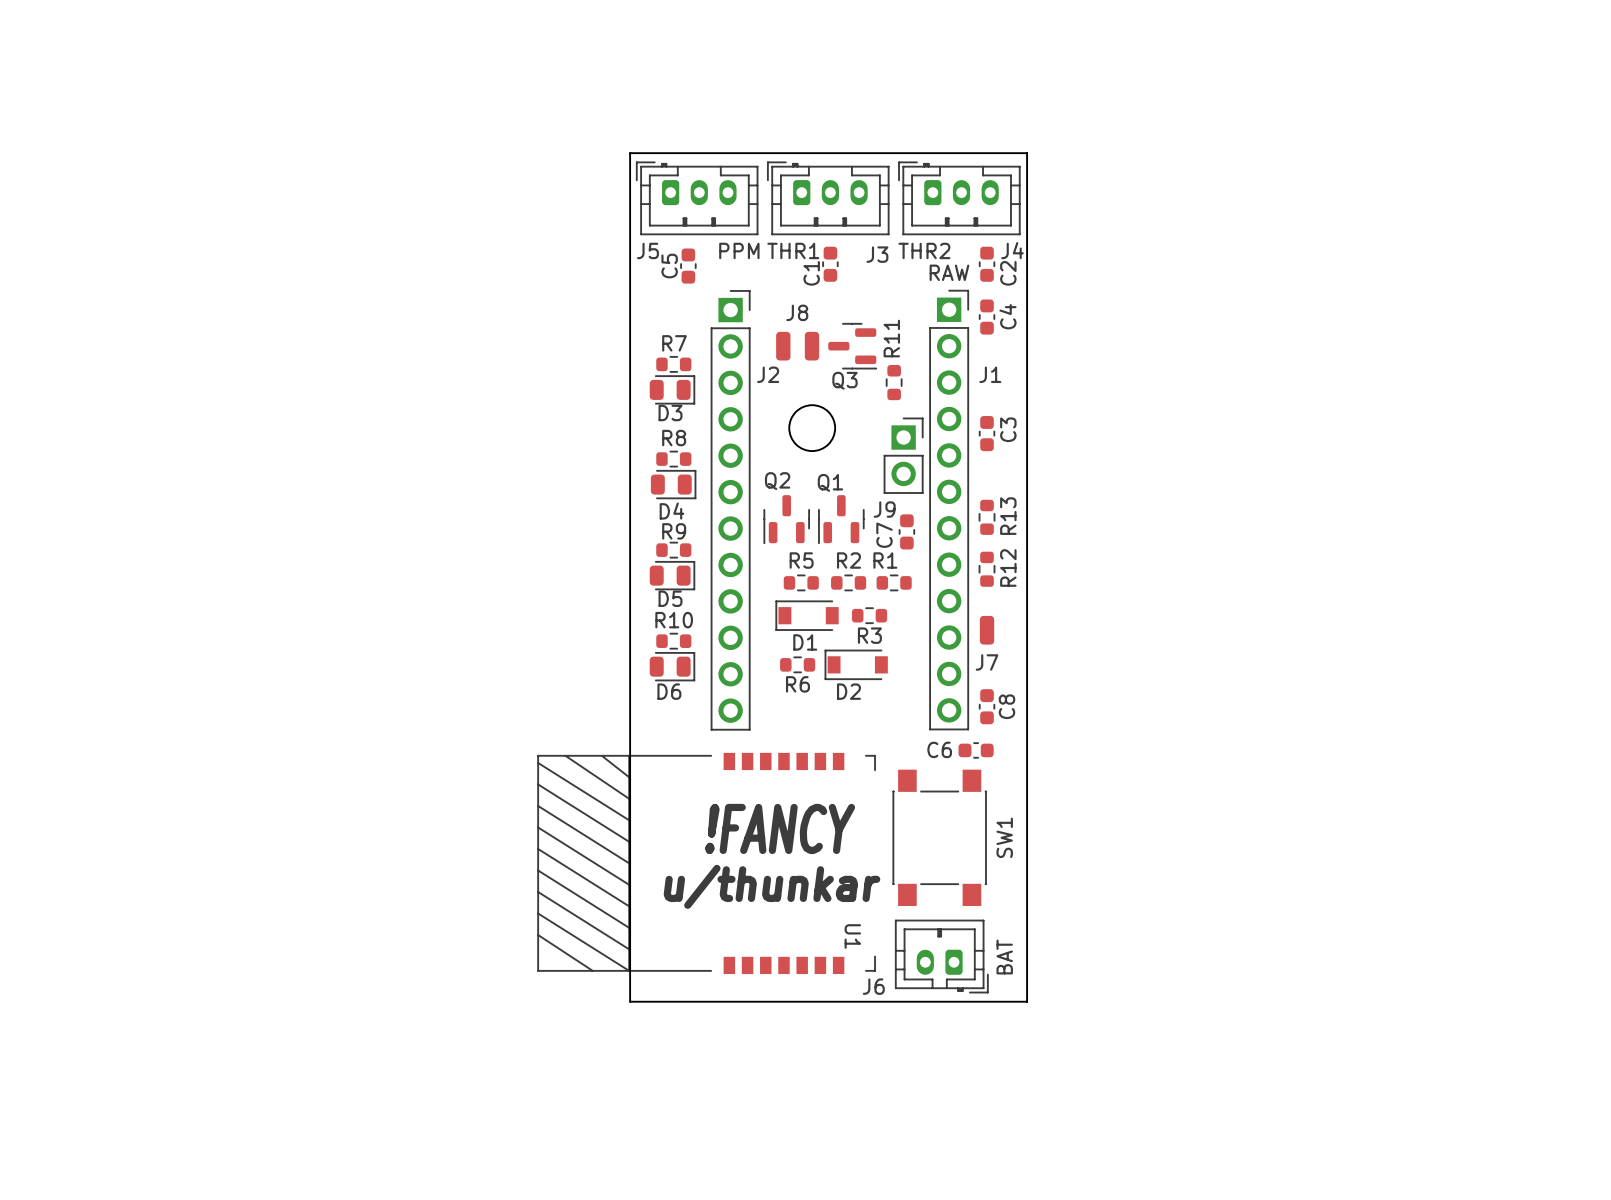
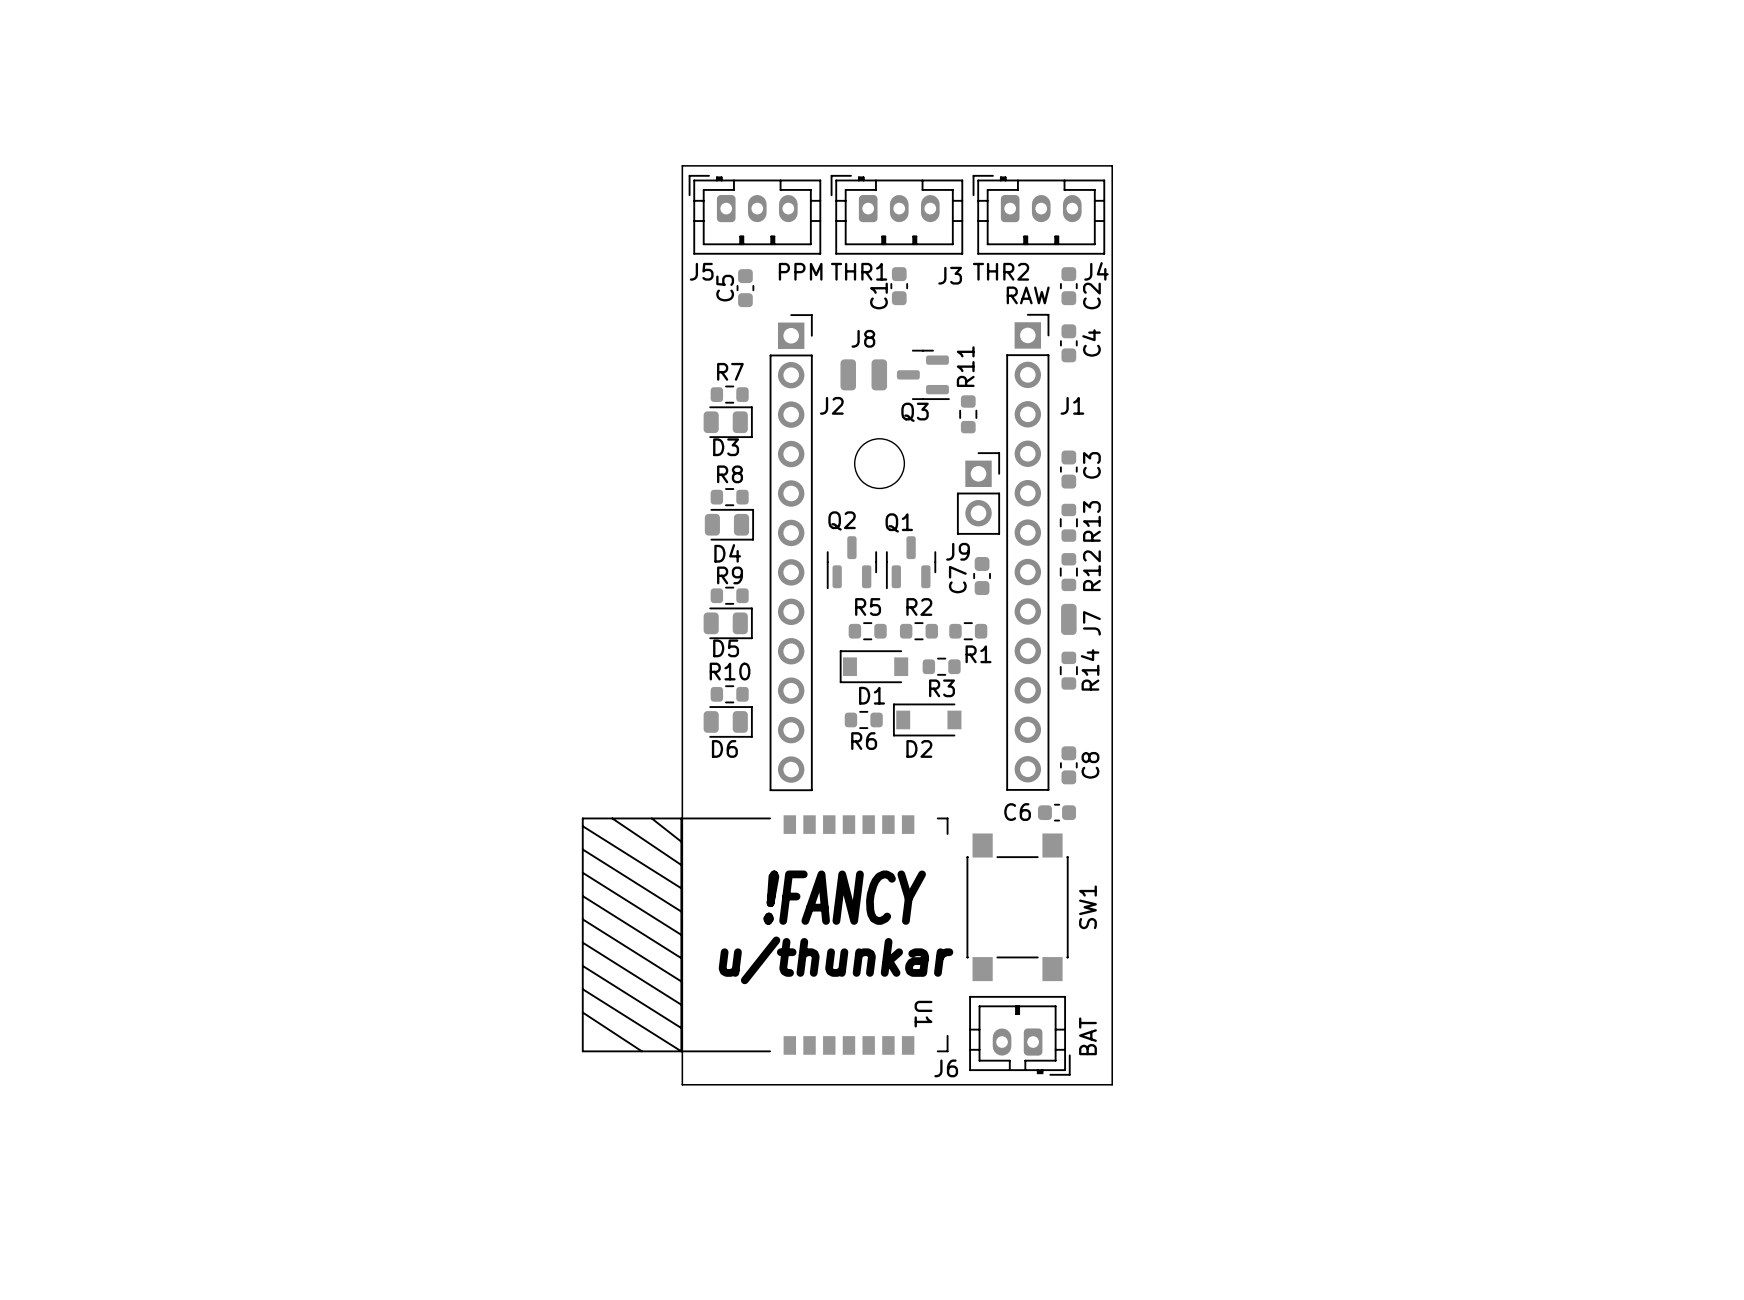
R13 position: (987, 517) -> (1068, 522)
R1 name position: R1 (885, 560) -> R1 (978, 654)
R12 position: (987, 569) -> (1068, 572)
R14: none -> (1068, 670)
J7 position: (987, 630) -> (1068, 619)
J7 name rotation: 0° (987, 662) -> 90° counterclockwise (1091, 623)
J7 name position: J7 (987, 662) -> J7 (1091, 623)

